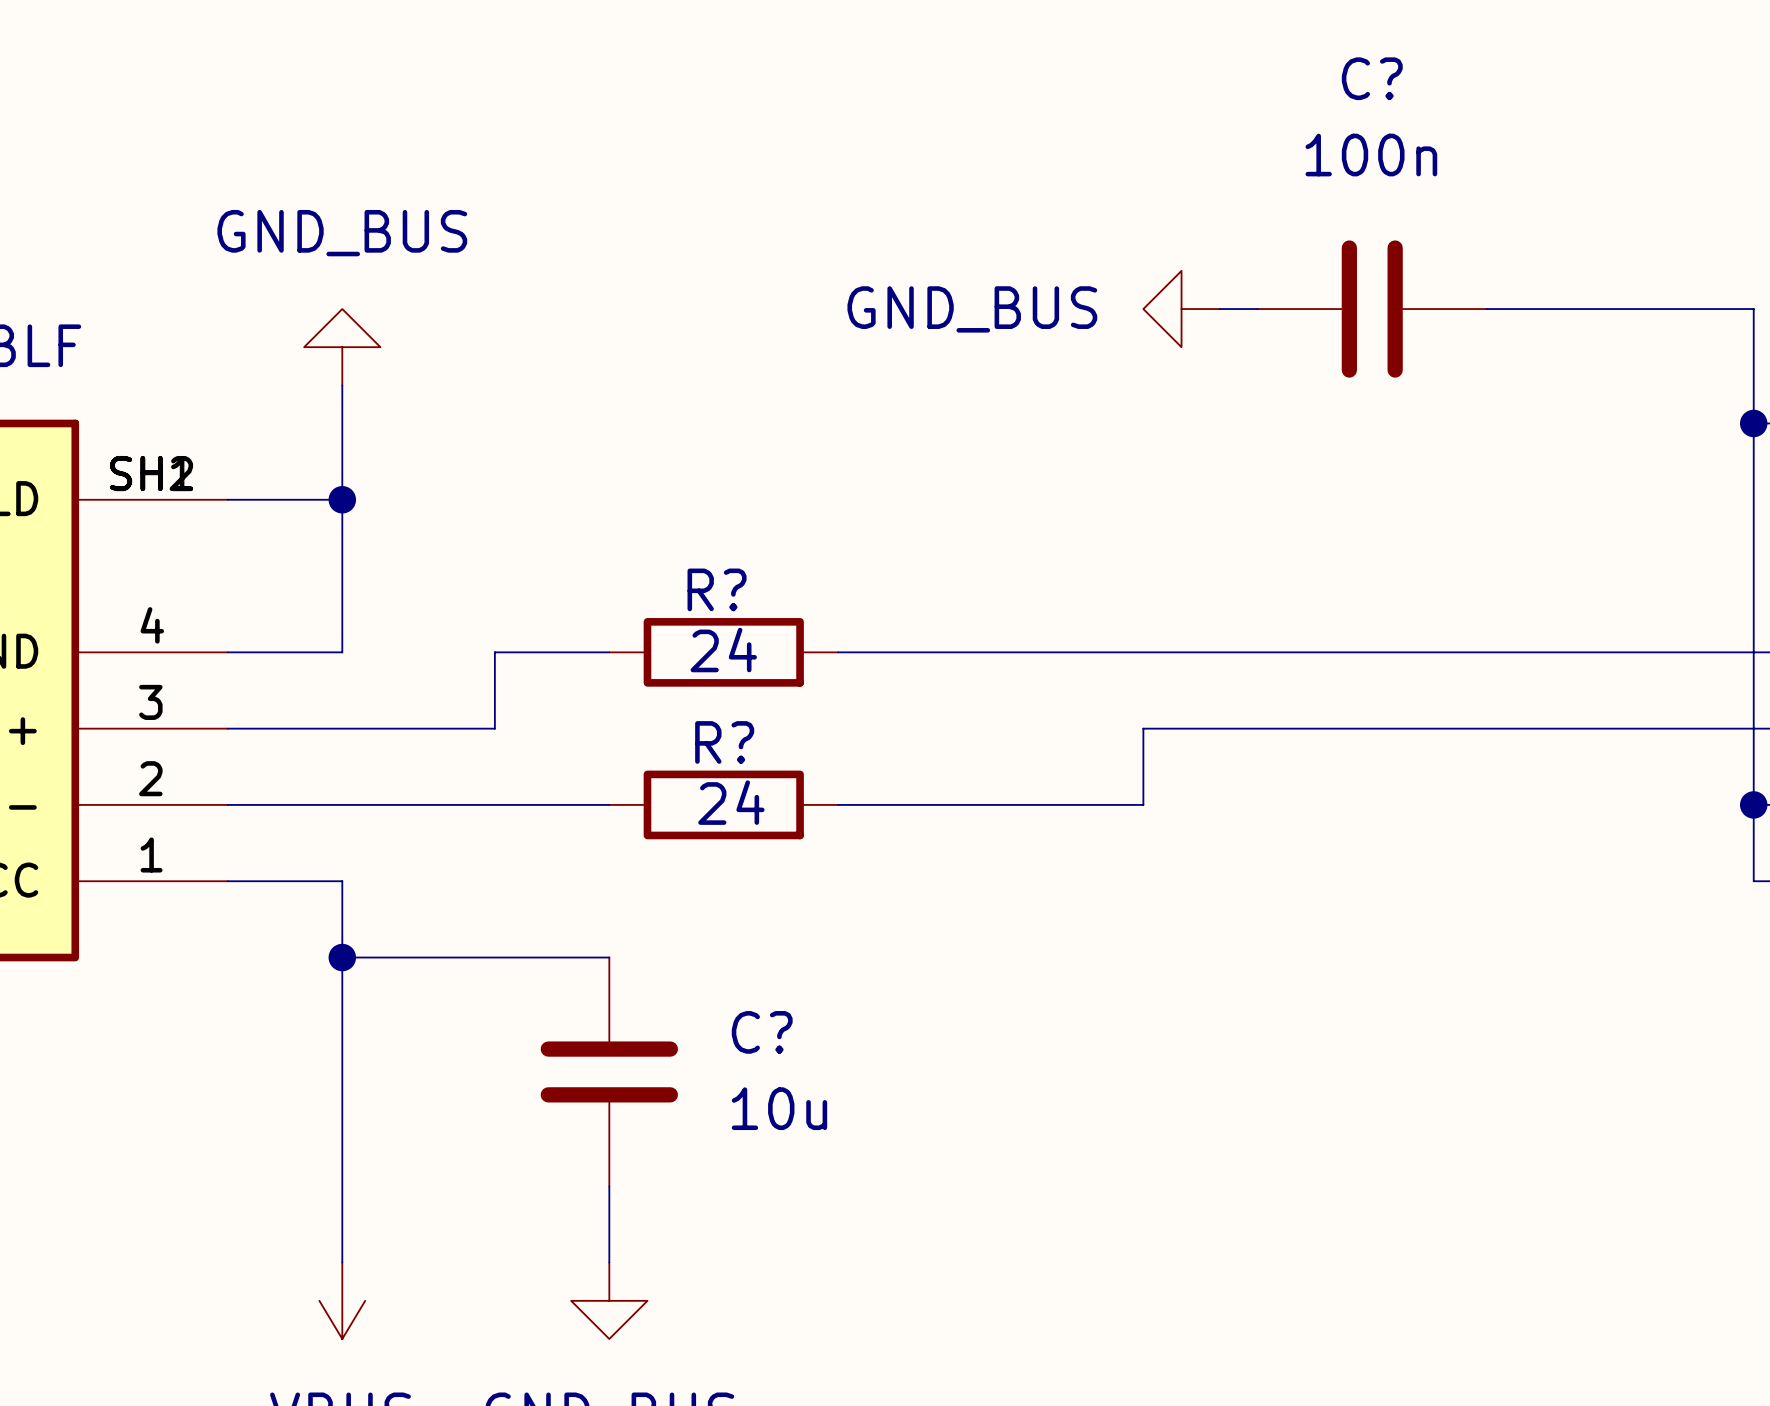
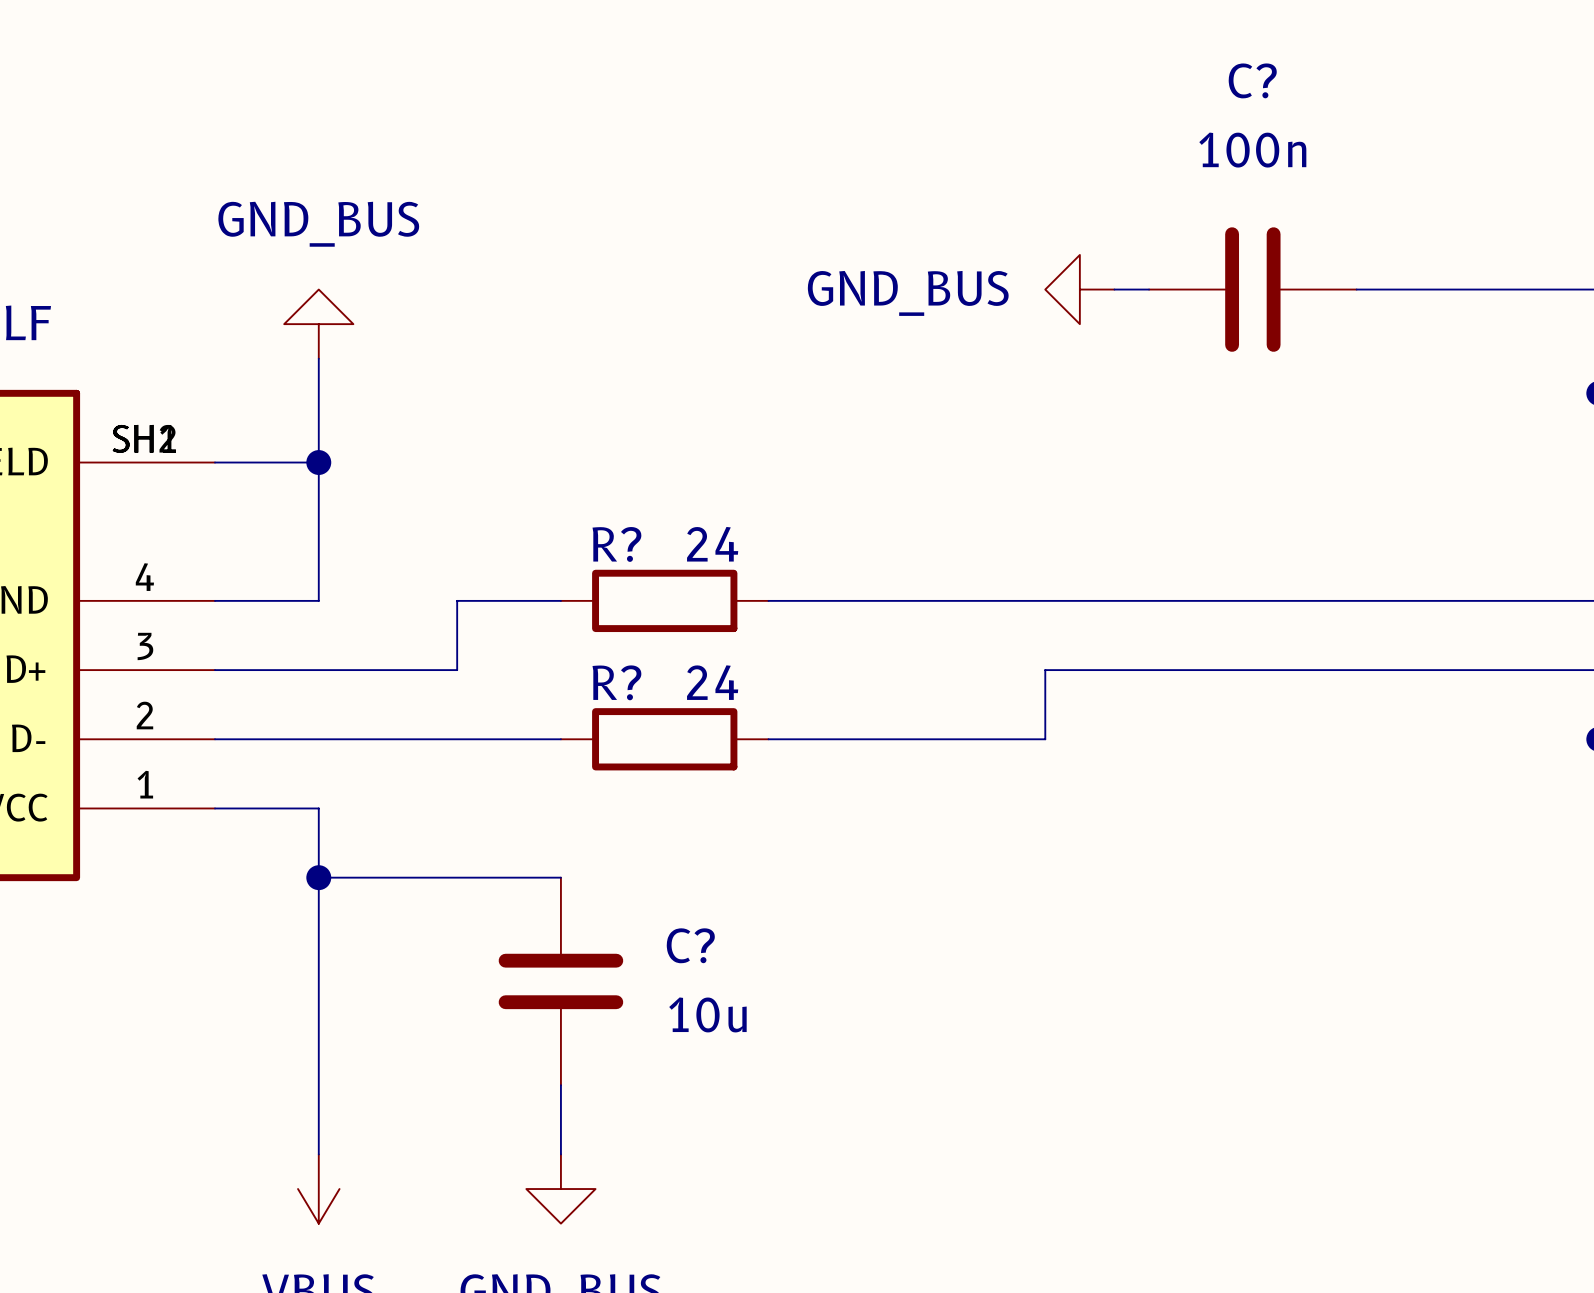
R? name position: R? (717, 589) -> R? (616, 544)
R? value position: 24 (723, 650) -> 24 (712, 544)
R? name position: R? (724, 742) -> R? (616, 682)
R? value position: 24 (731, 802) -> 24 (712, 682)

